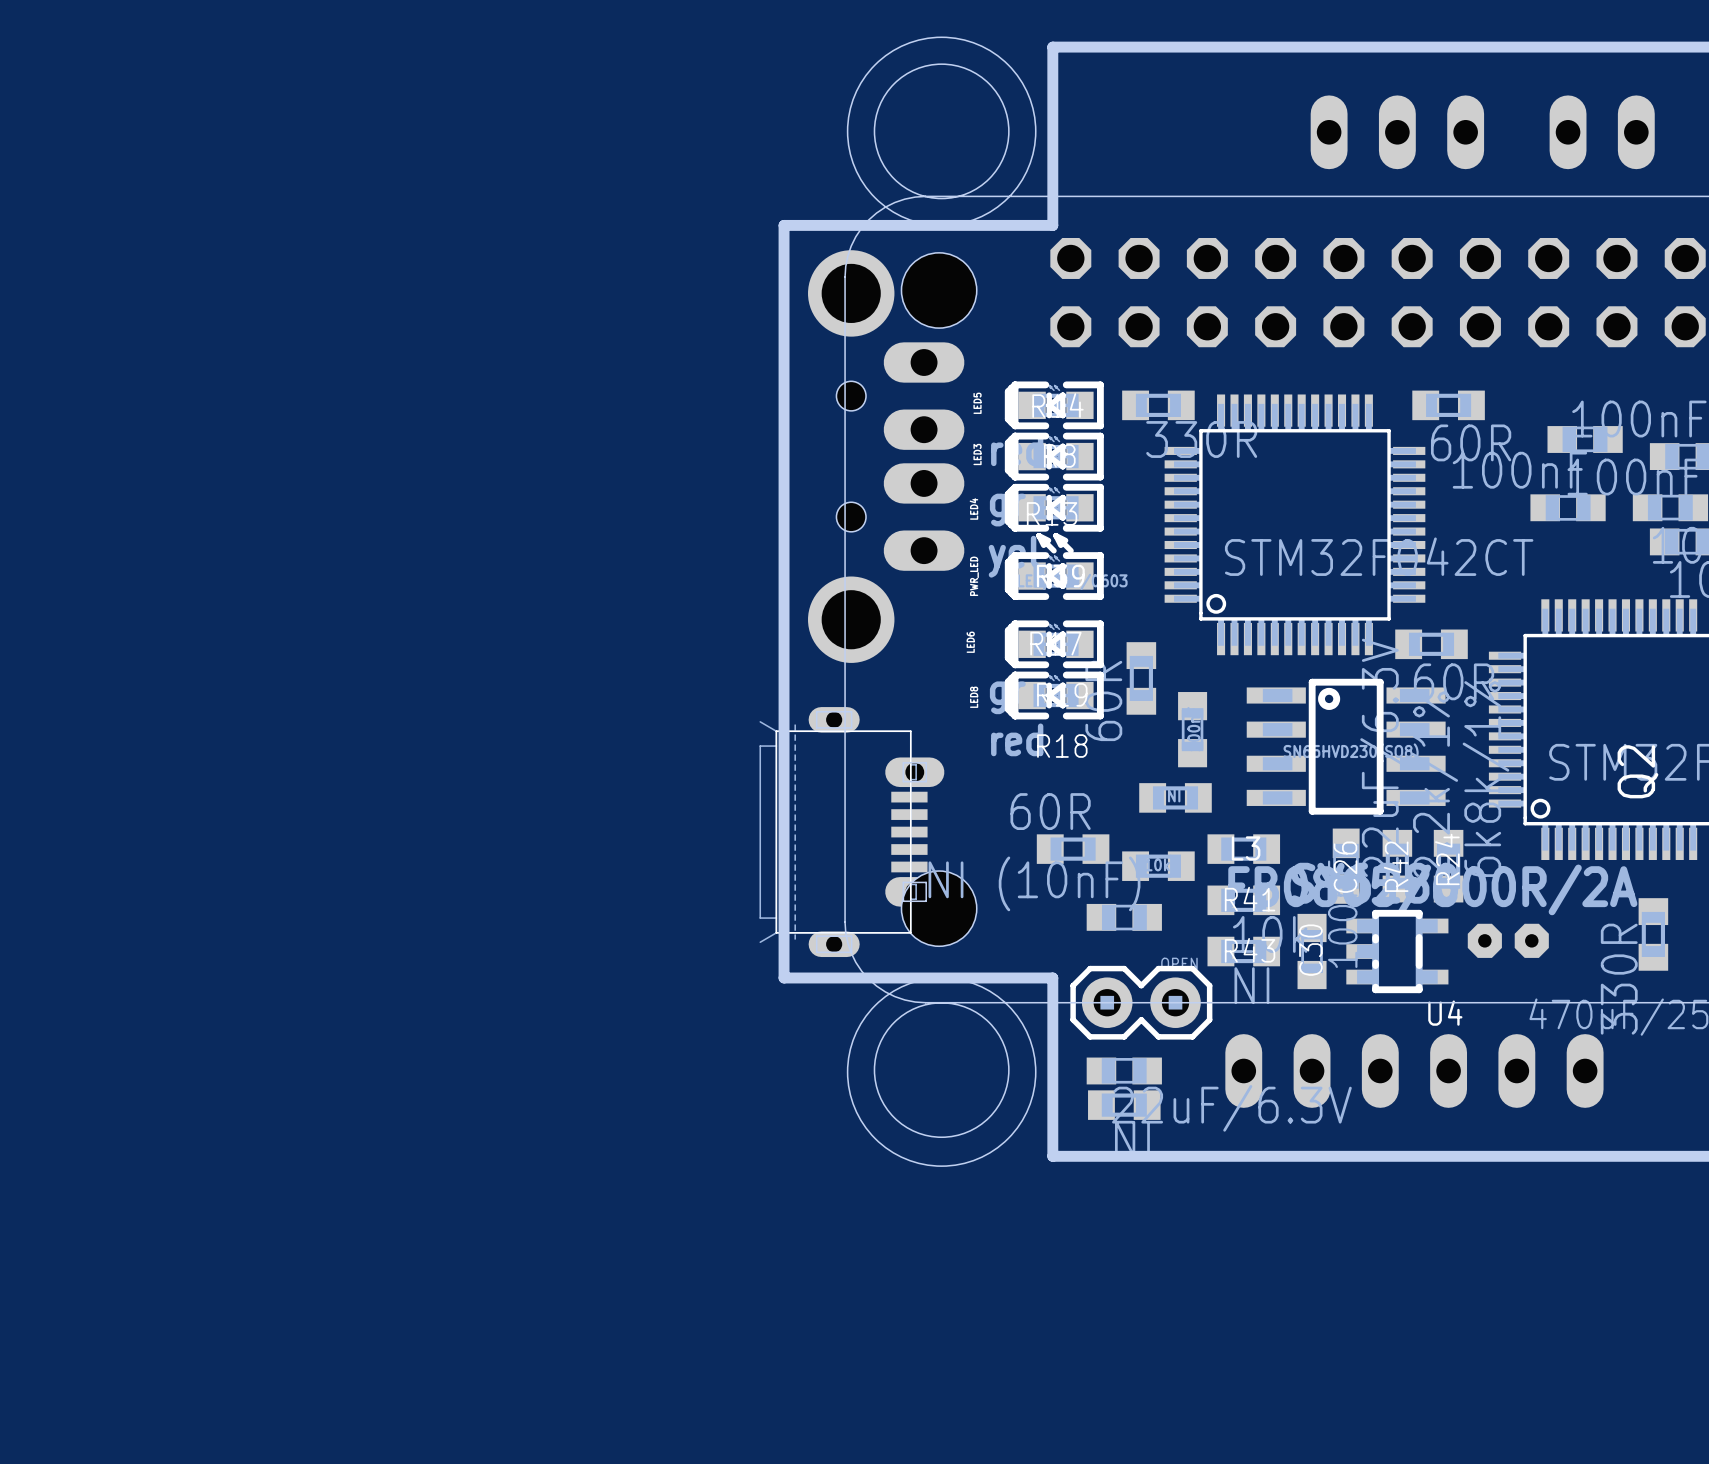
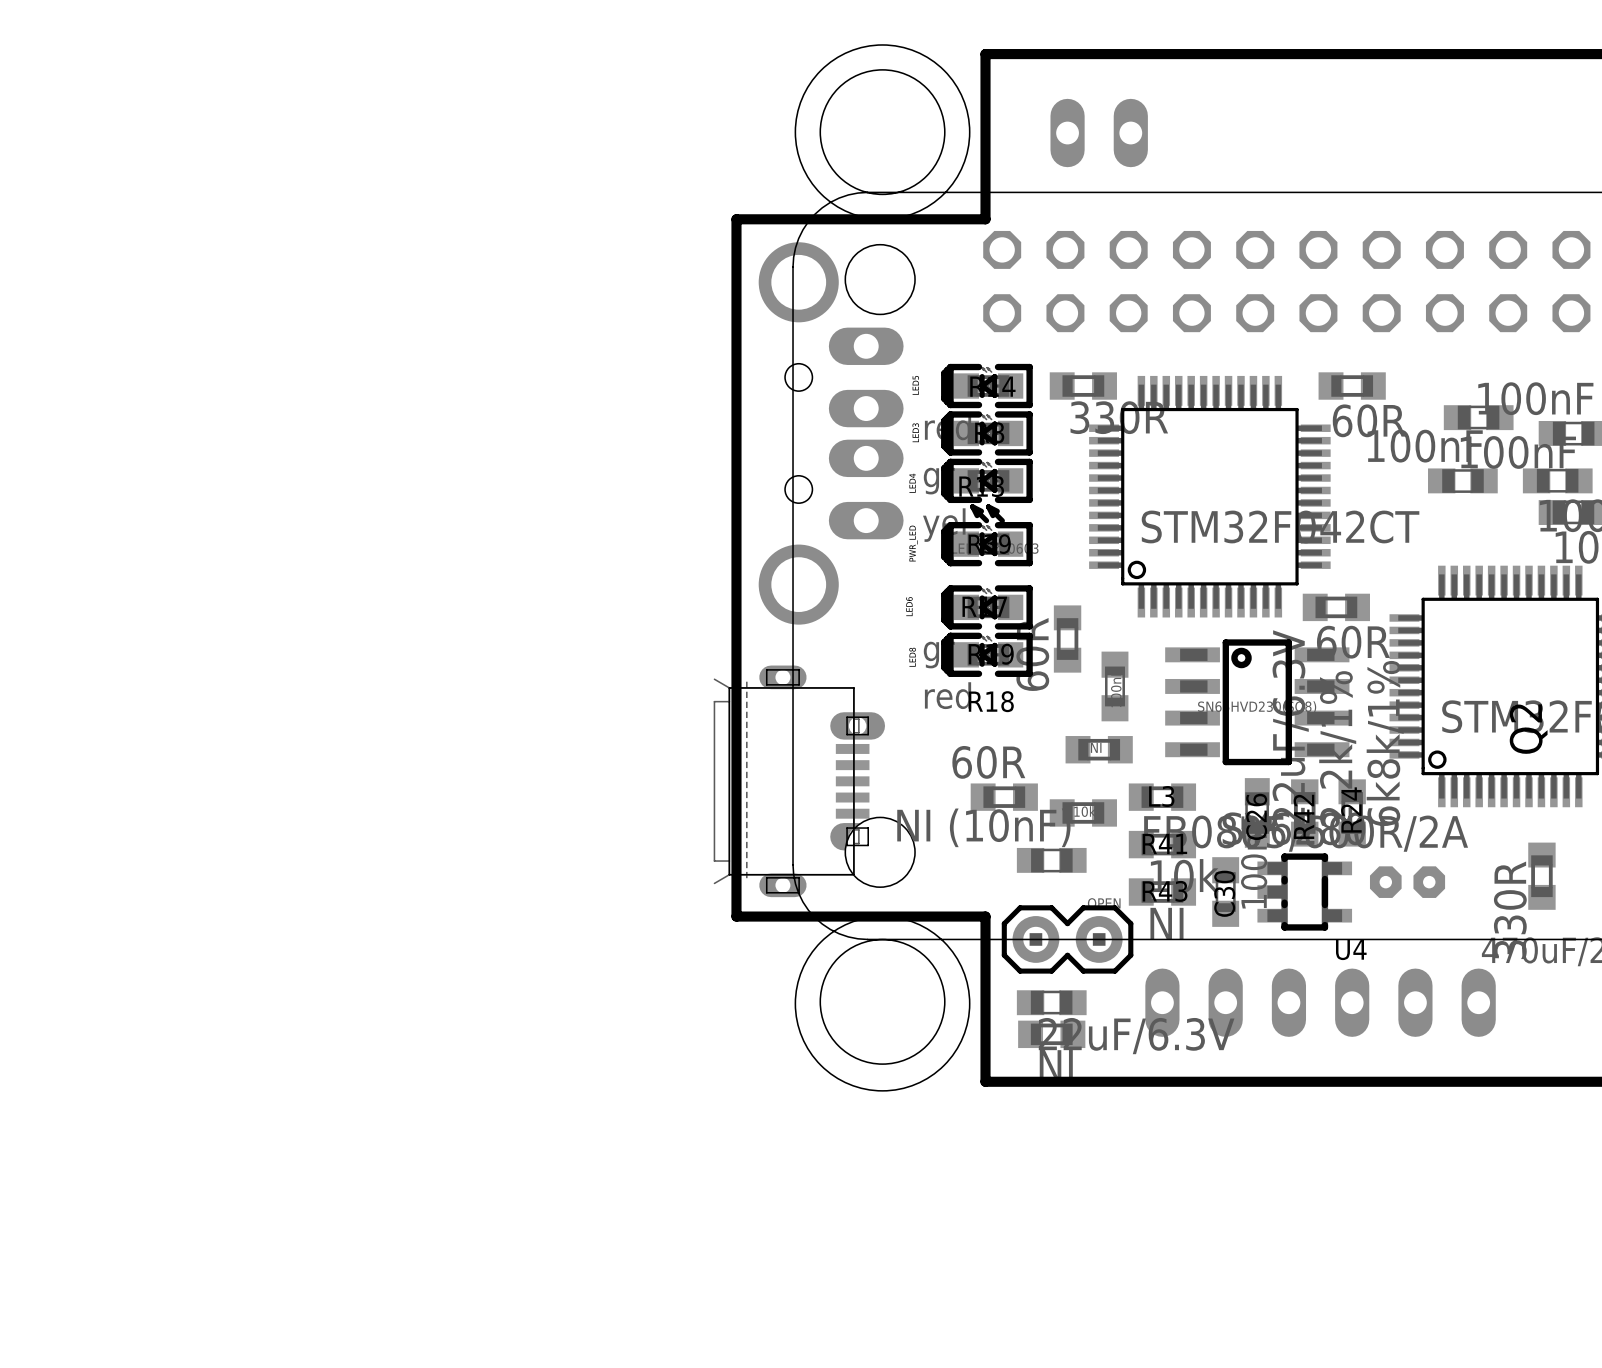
part: (1397, 132) -> none
part position: (1602, 132) -> (1099, 133)

